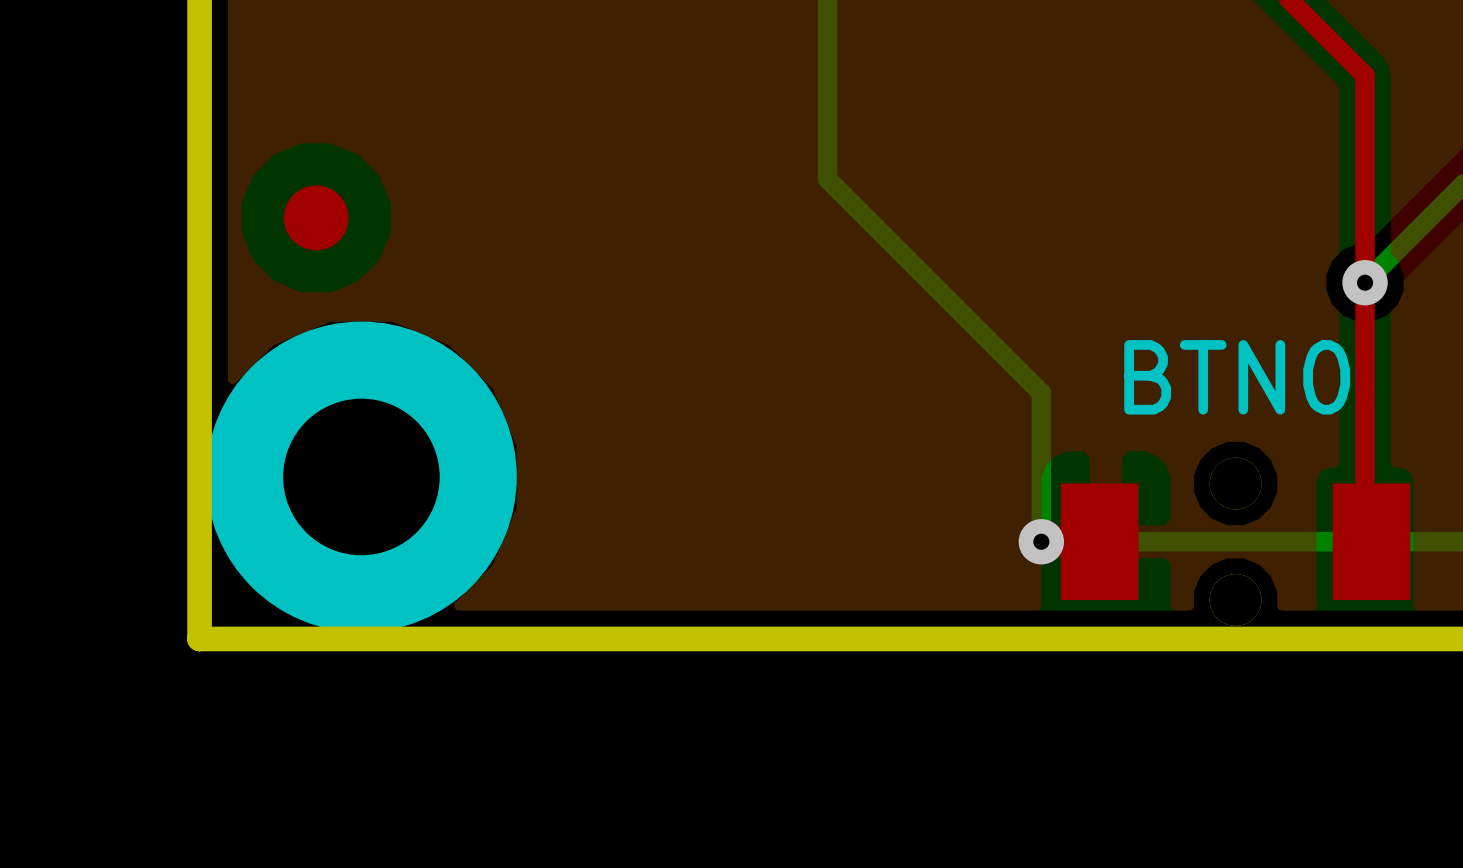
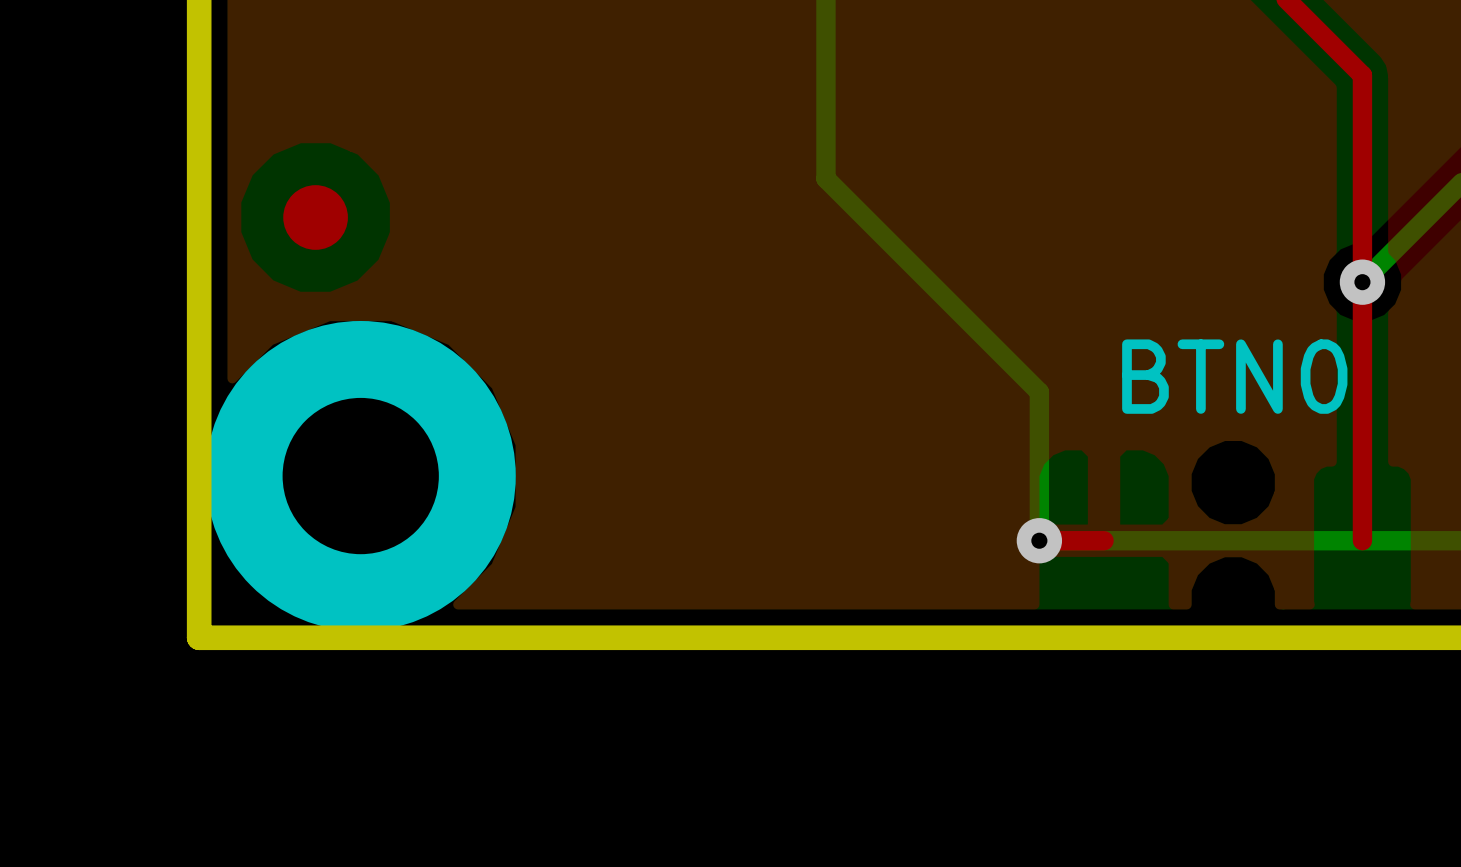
part: (1235, 541) -> none

